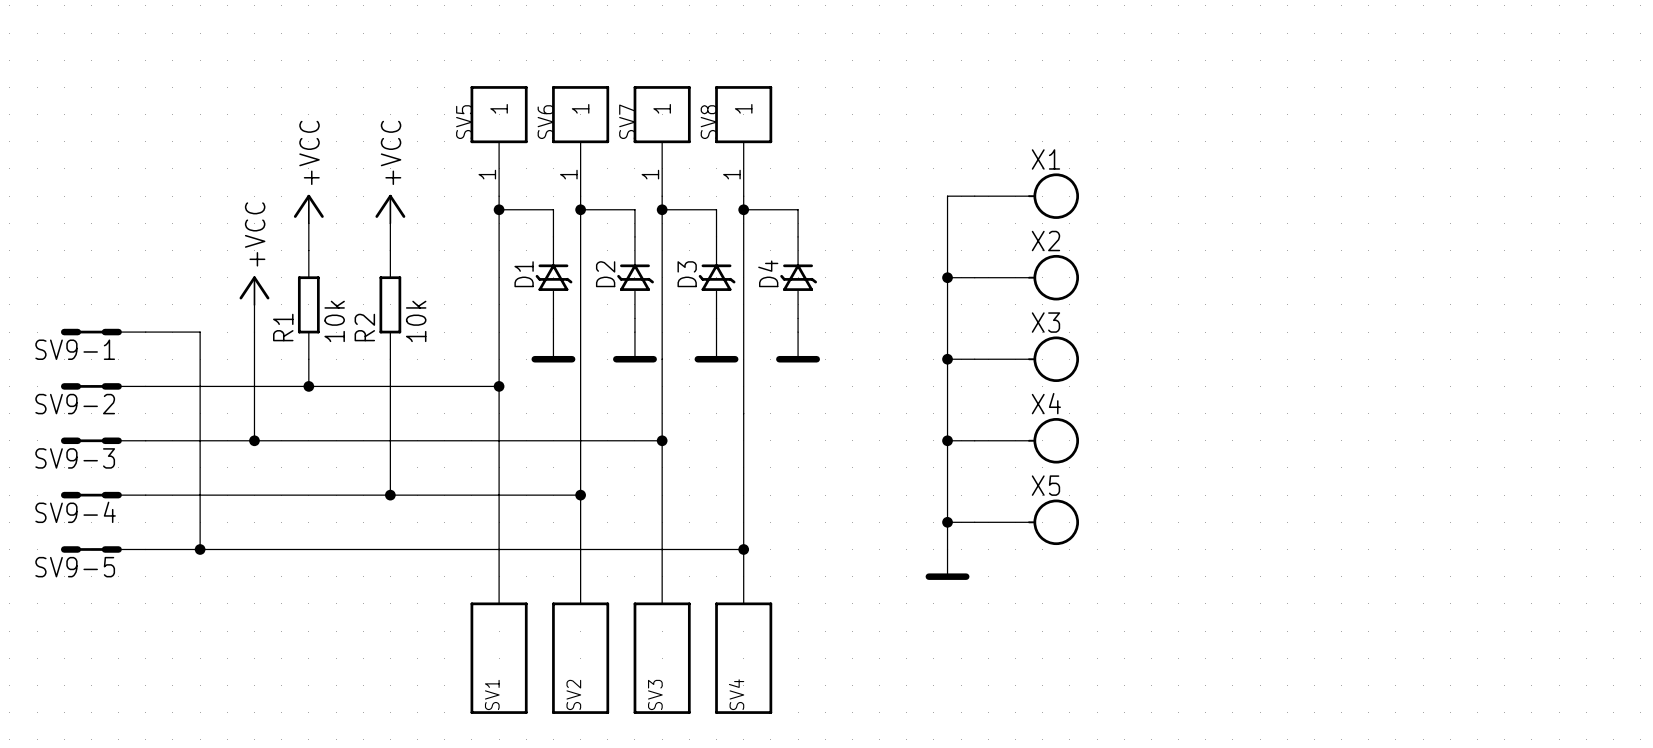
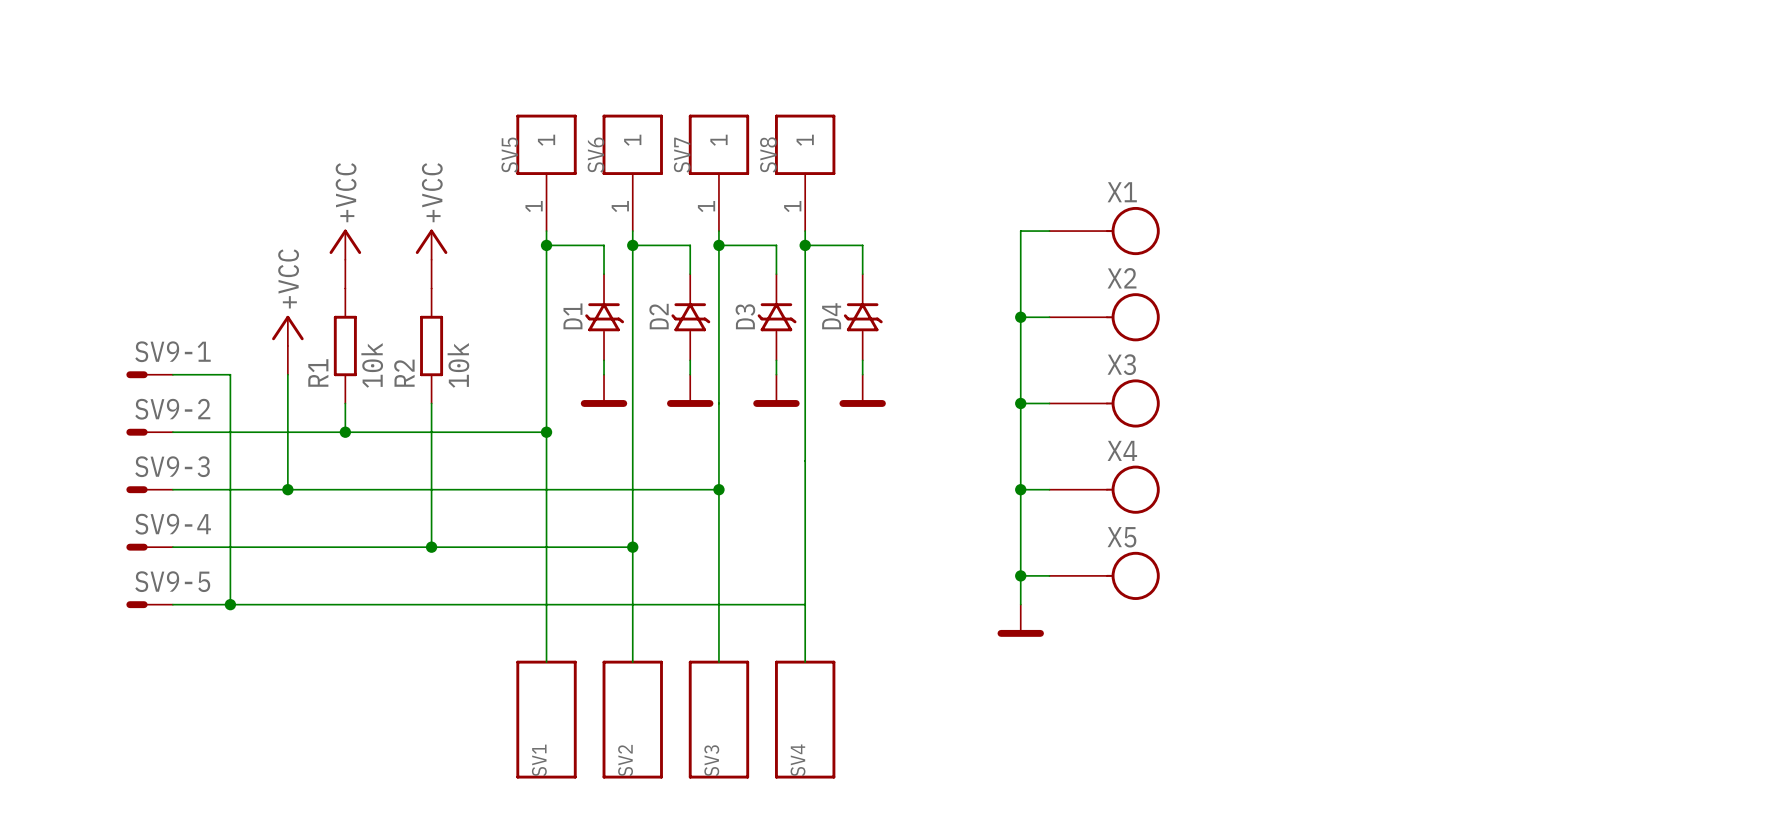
SV9-1 symbol: [60, 328, 146, 336] -> [126, 371, 173, 379]
SV9-1 name position: SV9-1 (75, 349) -> SV9-1 (173, 351)
SV9-2 symbol: [60, 383, 146, 390] -> [126, 428, 173, 436]
SV9-2 name position: SV9-2 (75, 404) -> SV9-2 (172, 409)
SV9-3 symbol: [60, 437, 146, 445] -> [126, 486, 173, 494]
SV9-3 name position: SV9-3 (75, 458) -> SV9-3 (172, 466)
SV9-4 symbol: [60, 491, 146, 499] -> [126, 543, 173, 551]
SV9-4 name position: SV9-4 (75, 512) -> SV9-4 (173, 524)
SV9-5 symbol: [60, 546, 146, 553] -> [126, 601, 173, 609]
junction: (743, 549) -> none
SV9-5 name position: SV9-5 (75, 567) -> SV9-5 (172, 581)

